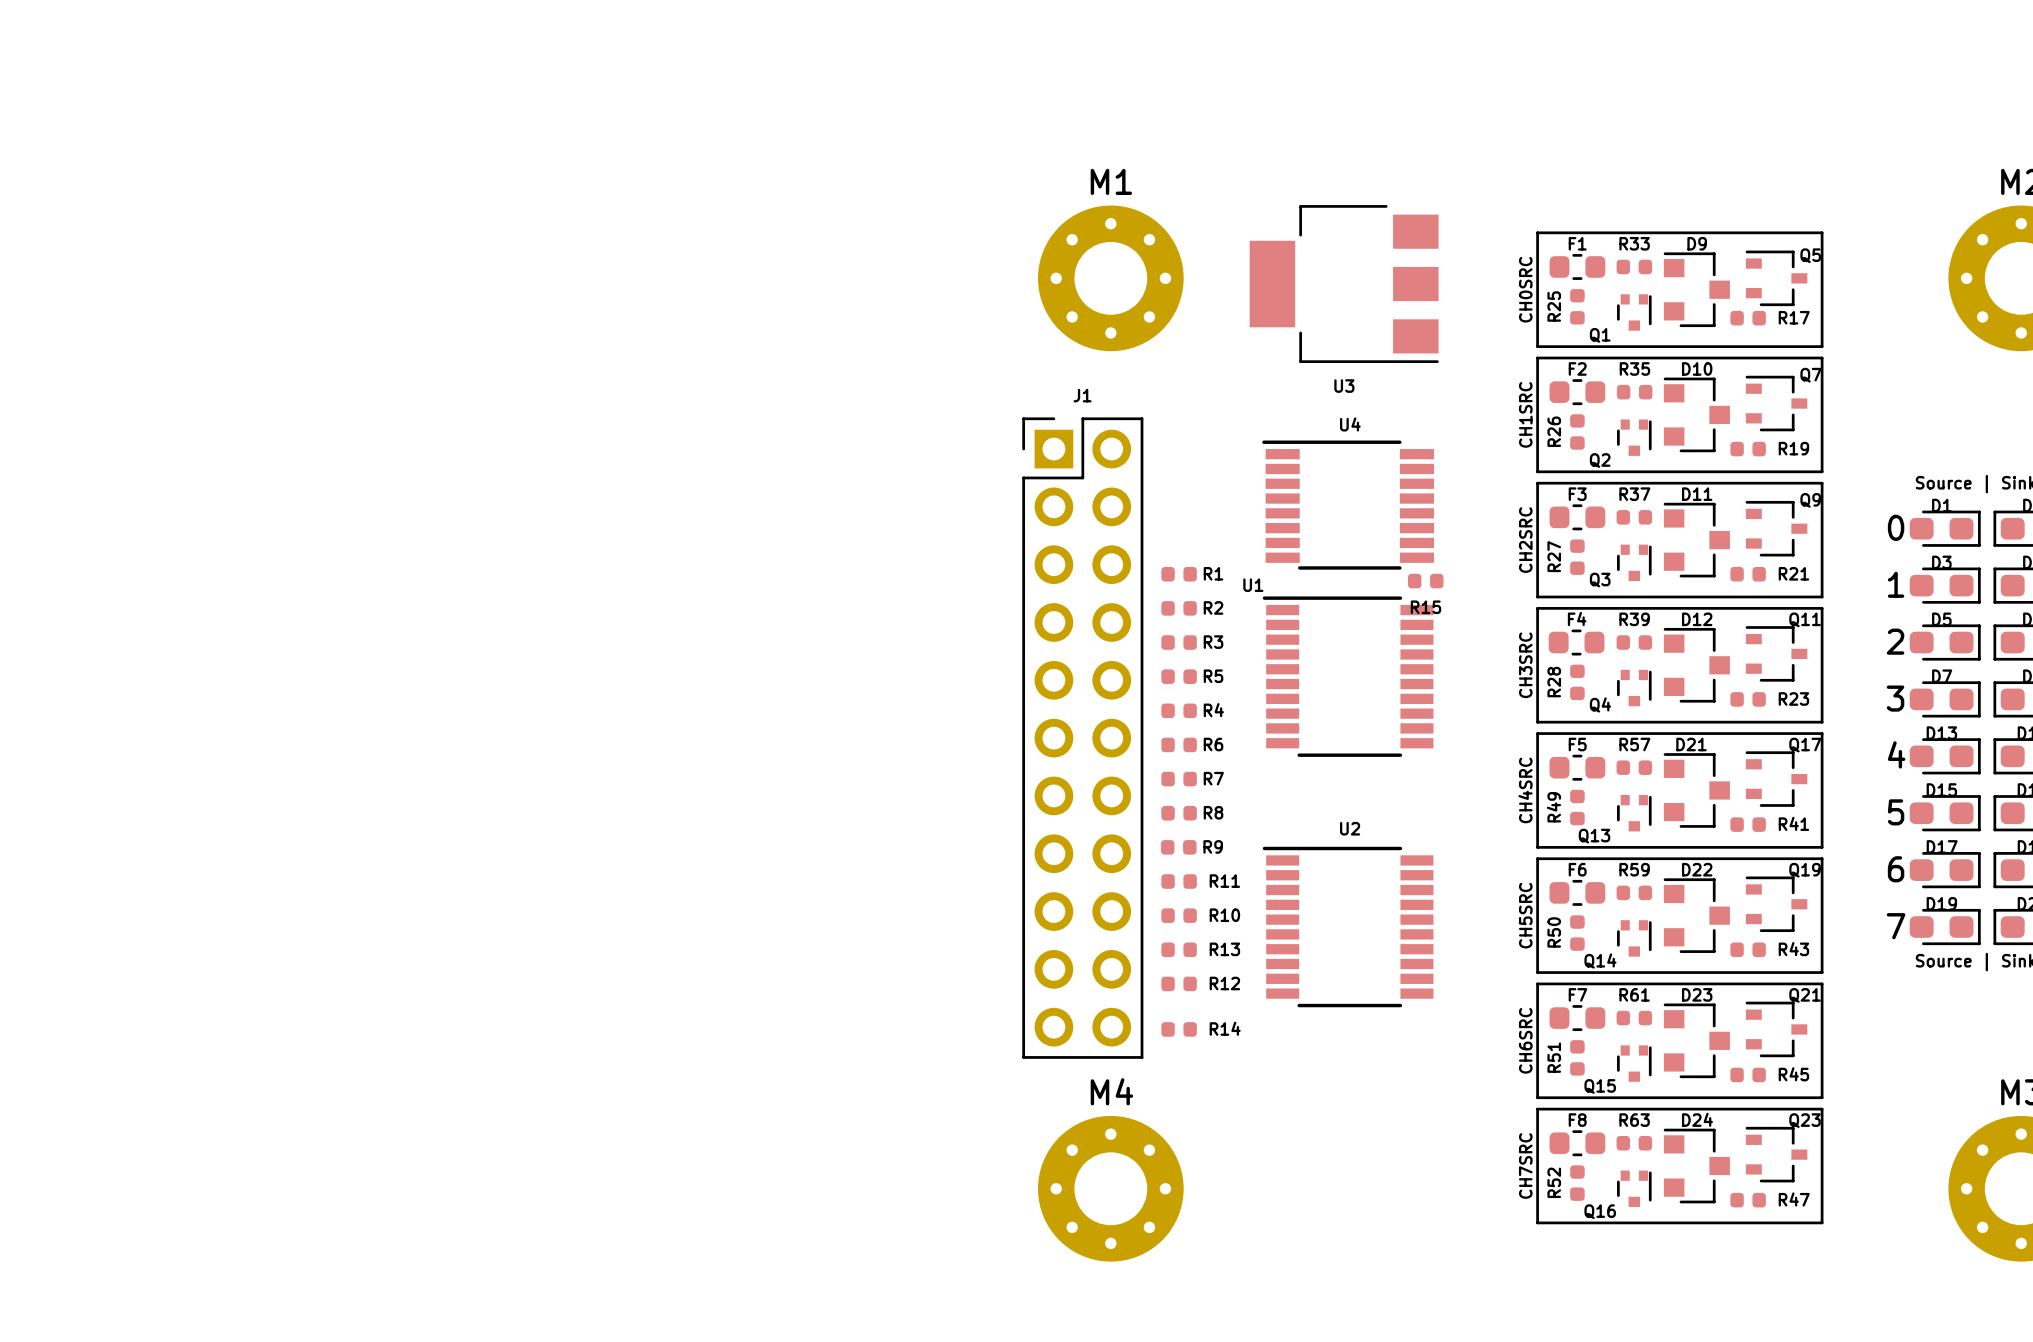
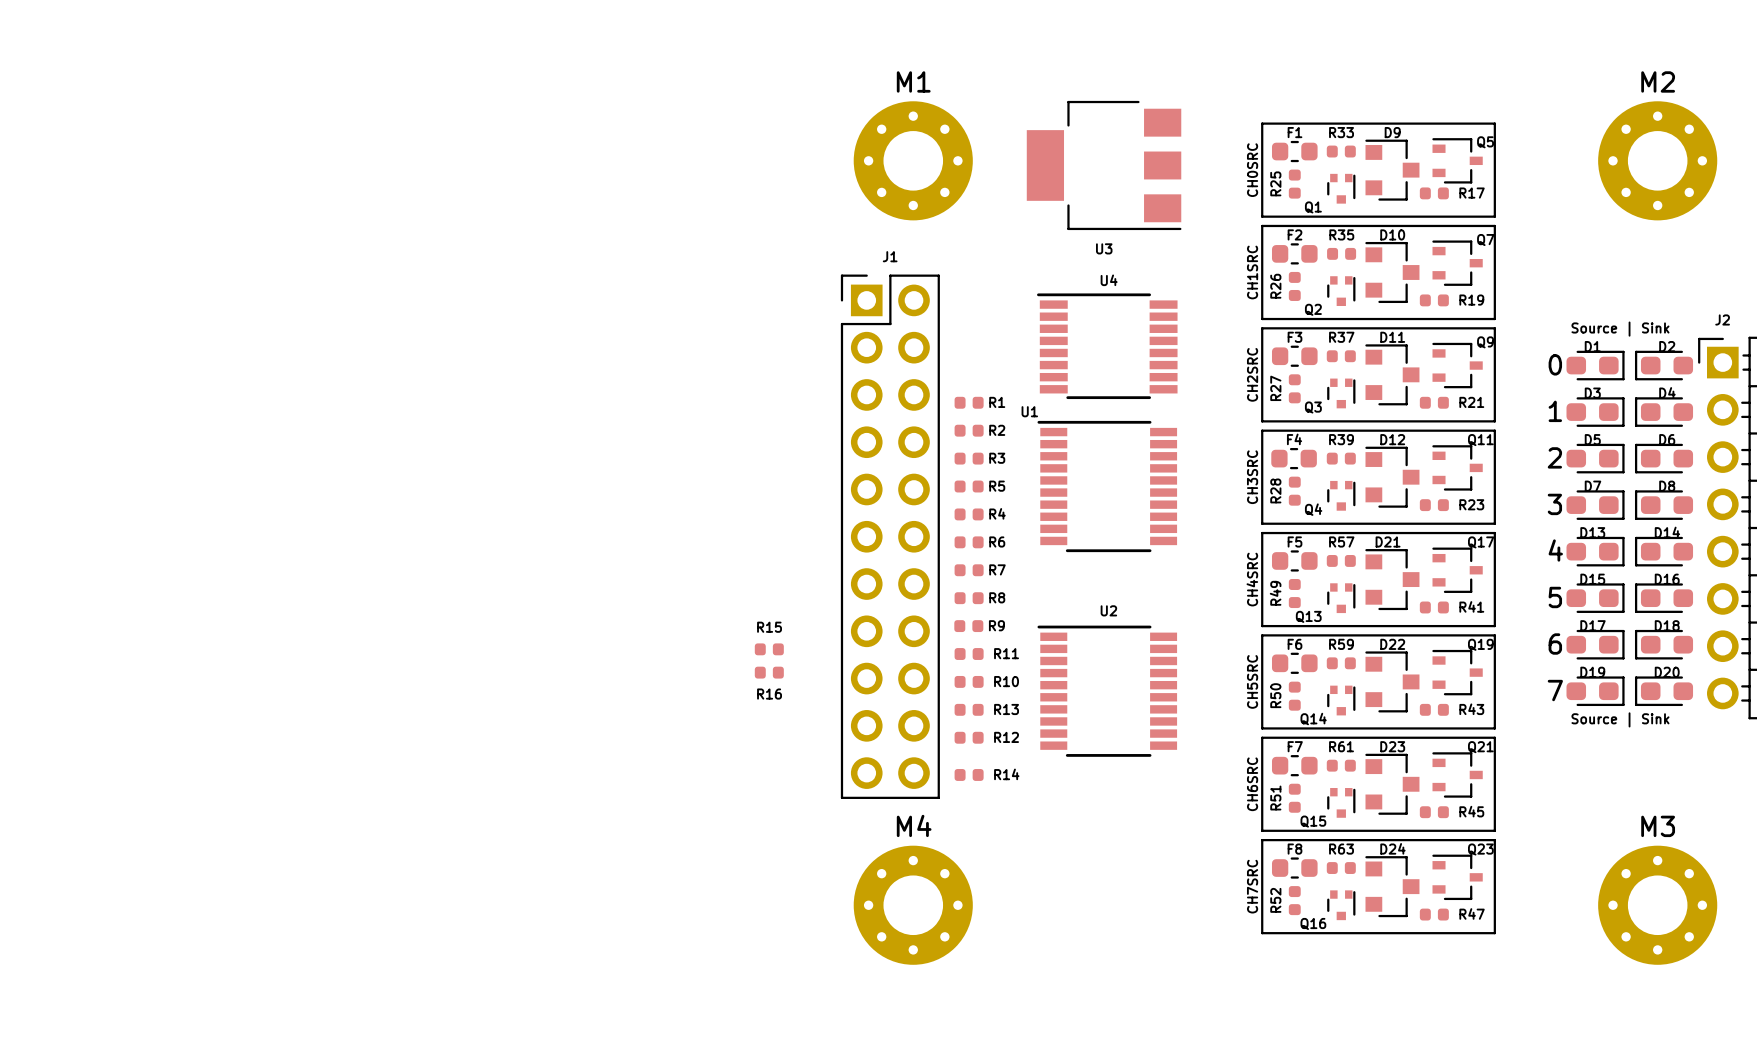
R15 position: (1425, 581) -> (769, 649)
R15 name position: R15 (1425, 607) -> R15 (769, 627)
R16: none -> (769, 672)

